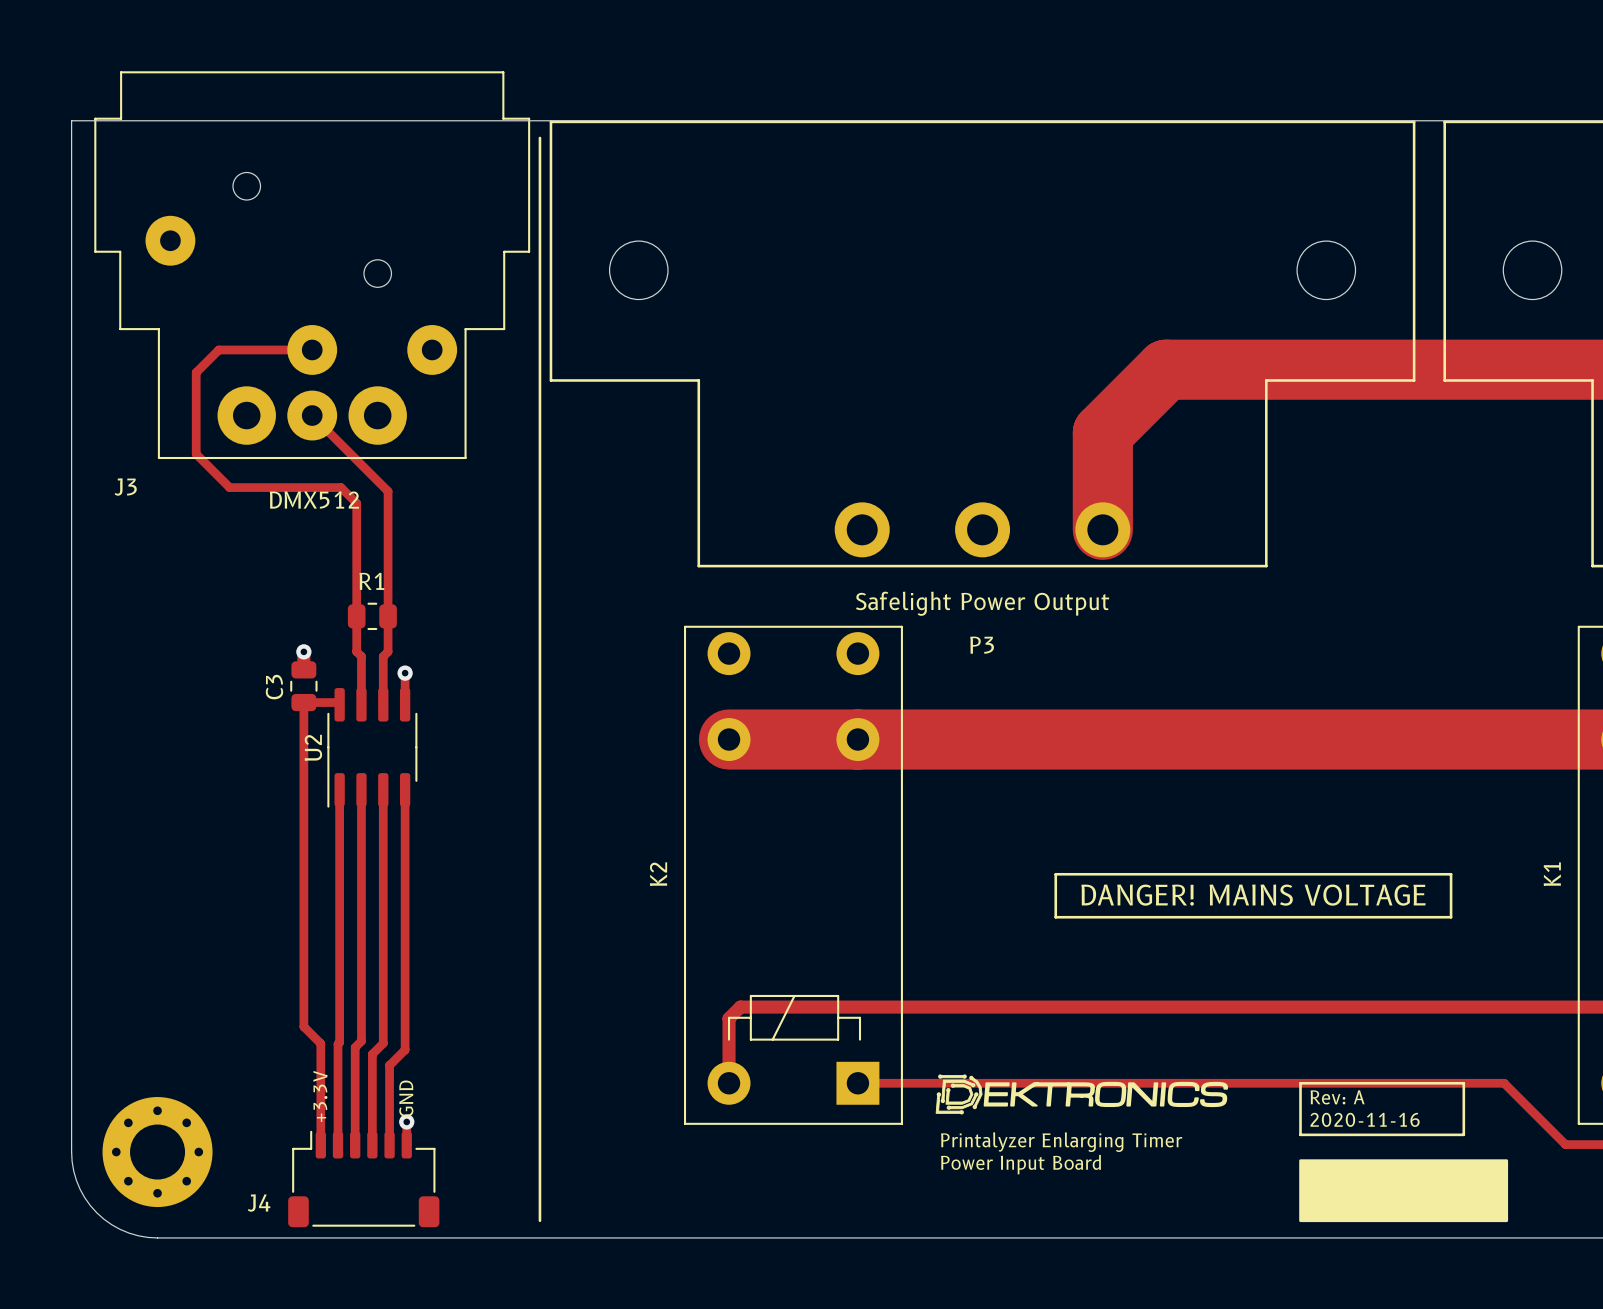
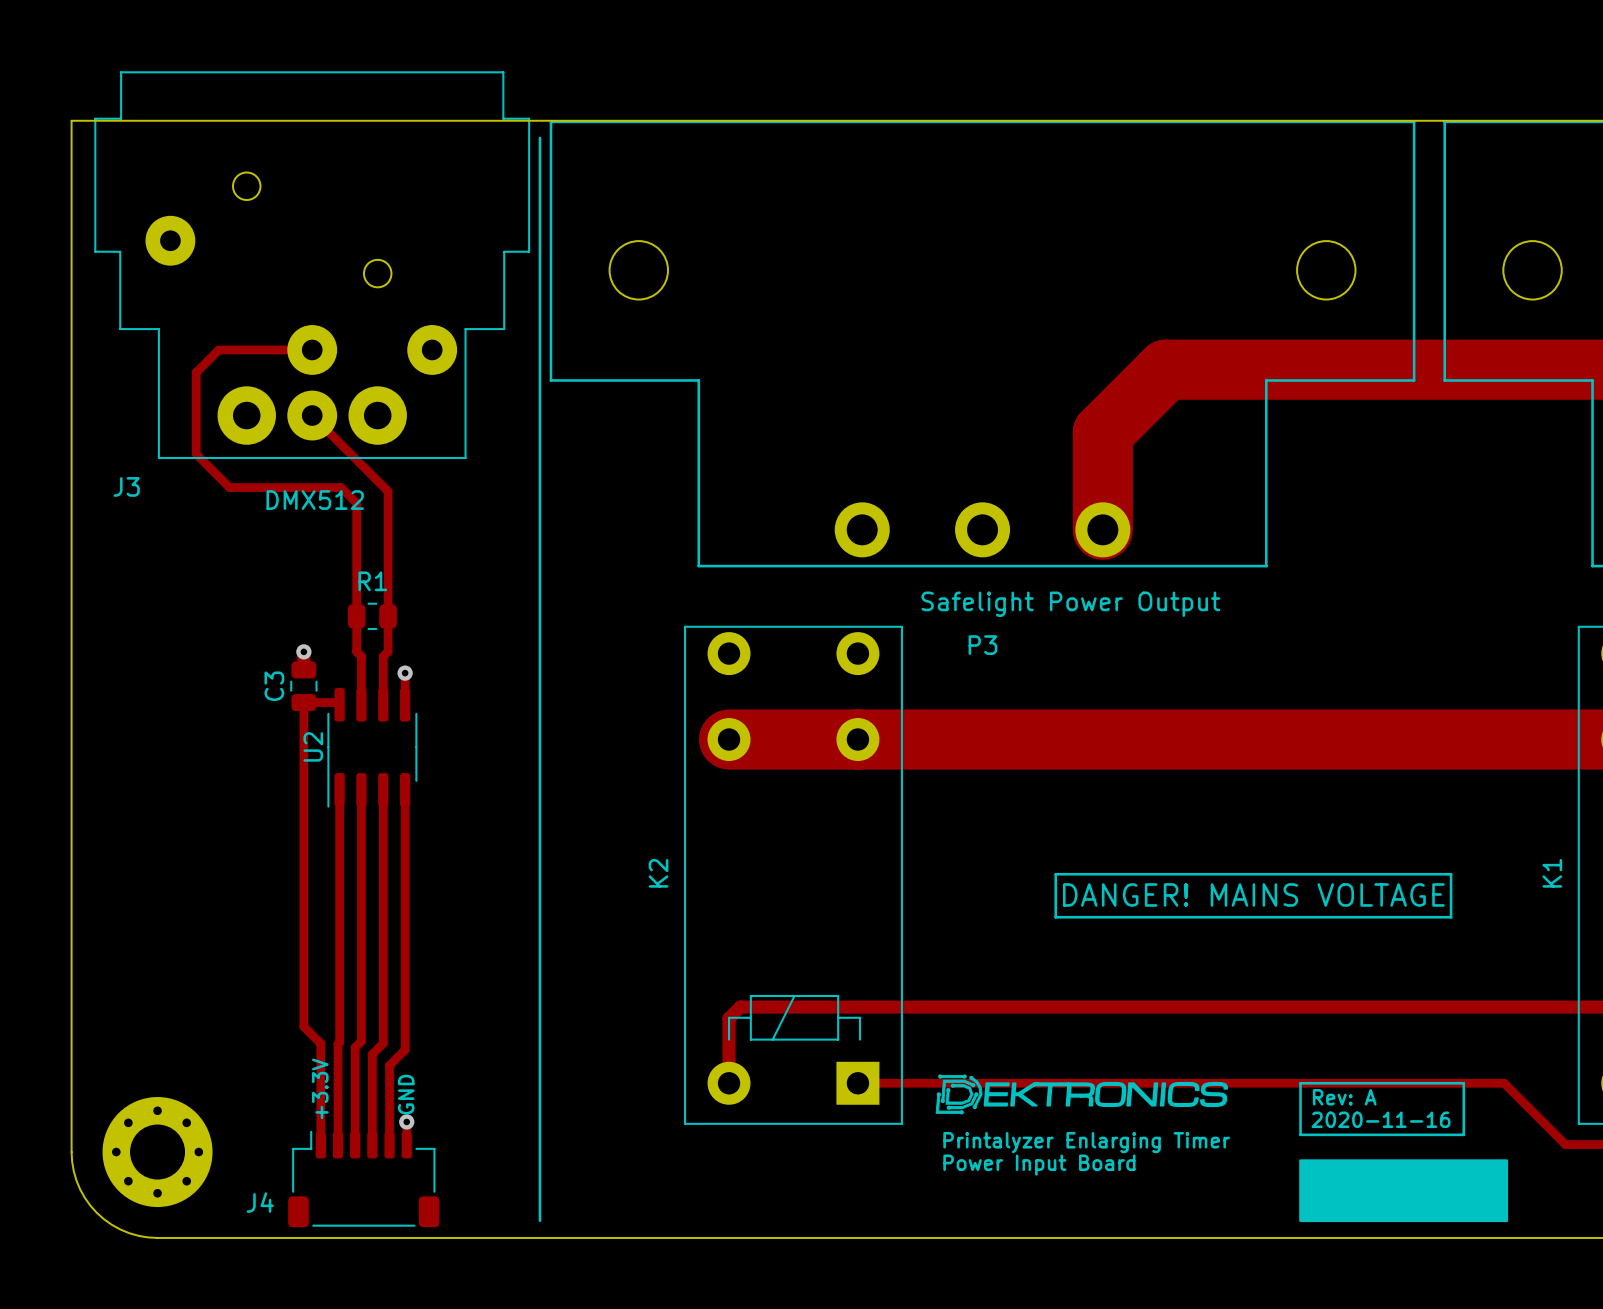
text position: Safelight Power Output (982, 603) -> Safelight Power Output (1070, 604)

